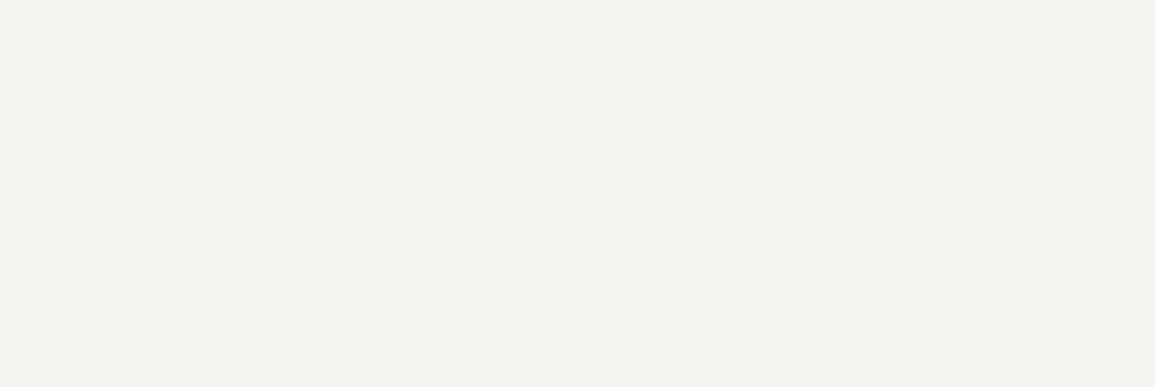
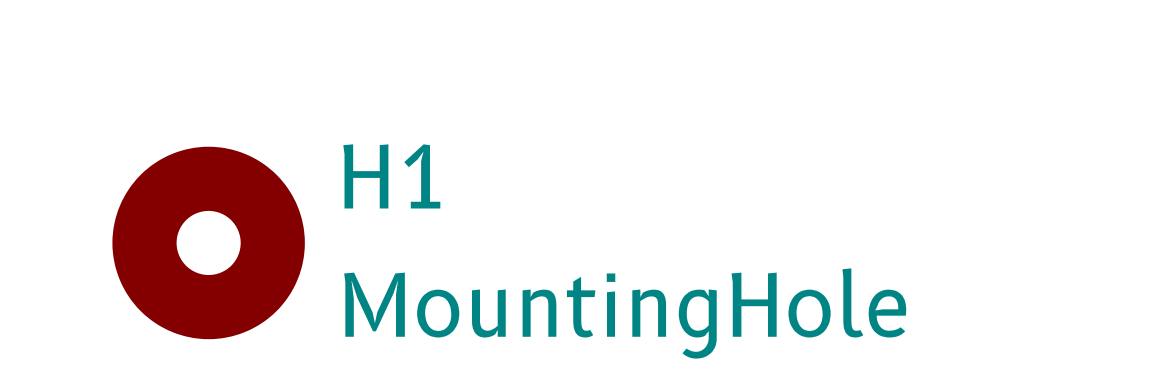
H1: none -> MountingHole (208, 242)

